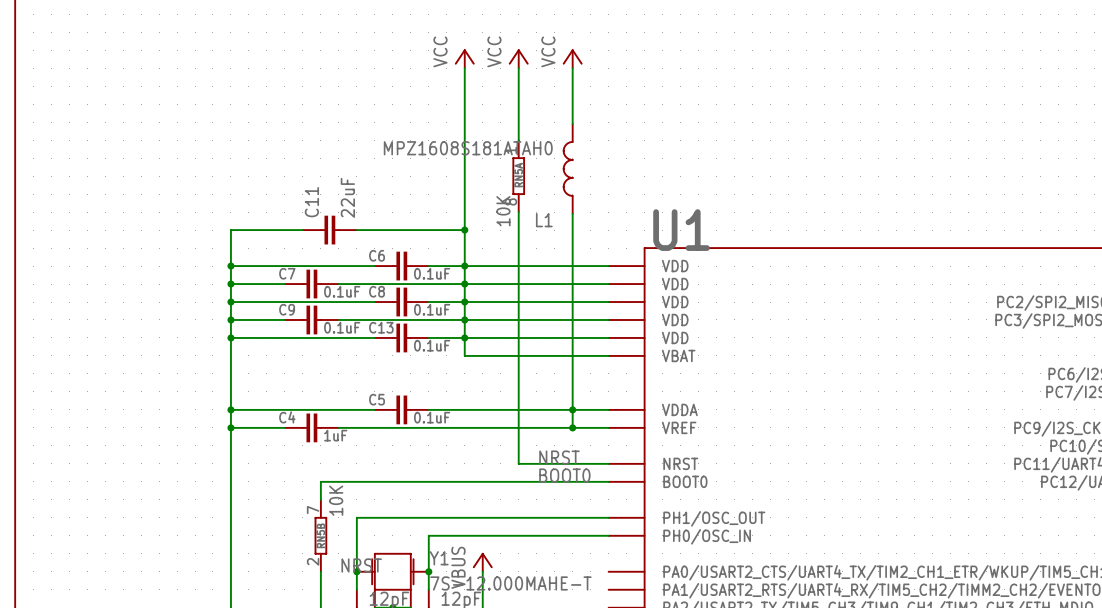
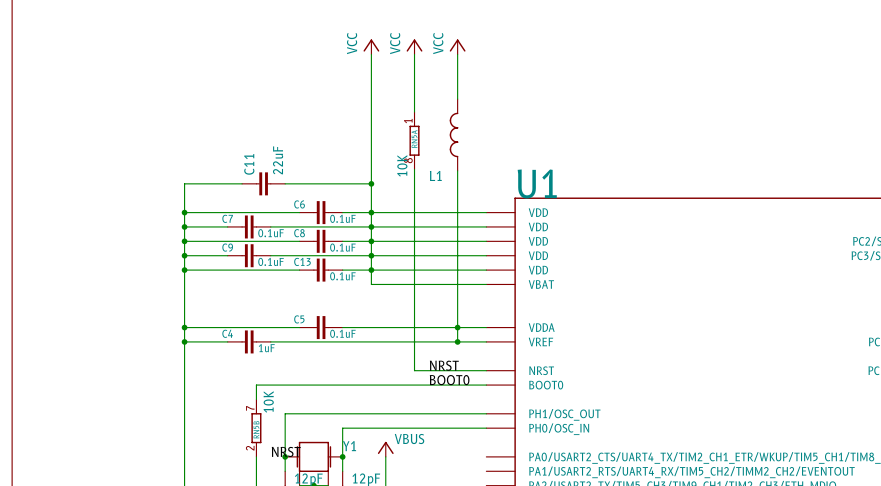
L1 value: MPZ1608S181ATAH0 (468, 148) -> none
power symbol text rotation: 0° (458, 567) -> 90° clockwise (409, 439)
power symbol text position: VBUS (458, 567) -> VBUS (409, 439)
Y1 value: 7S-12.000MAHE-T (510, 583) -> none

